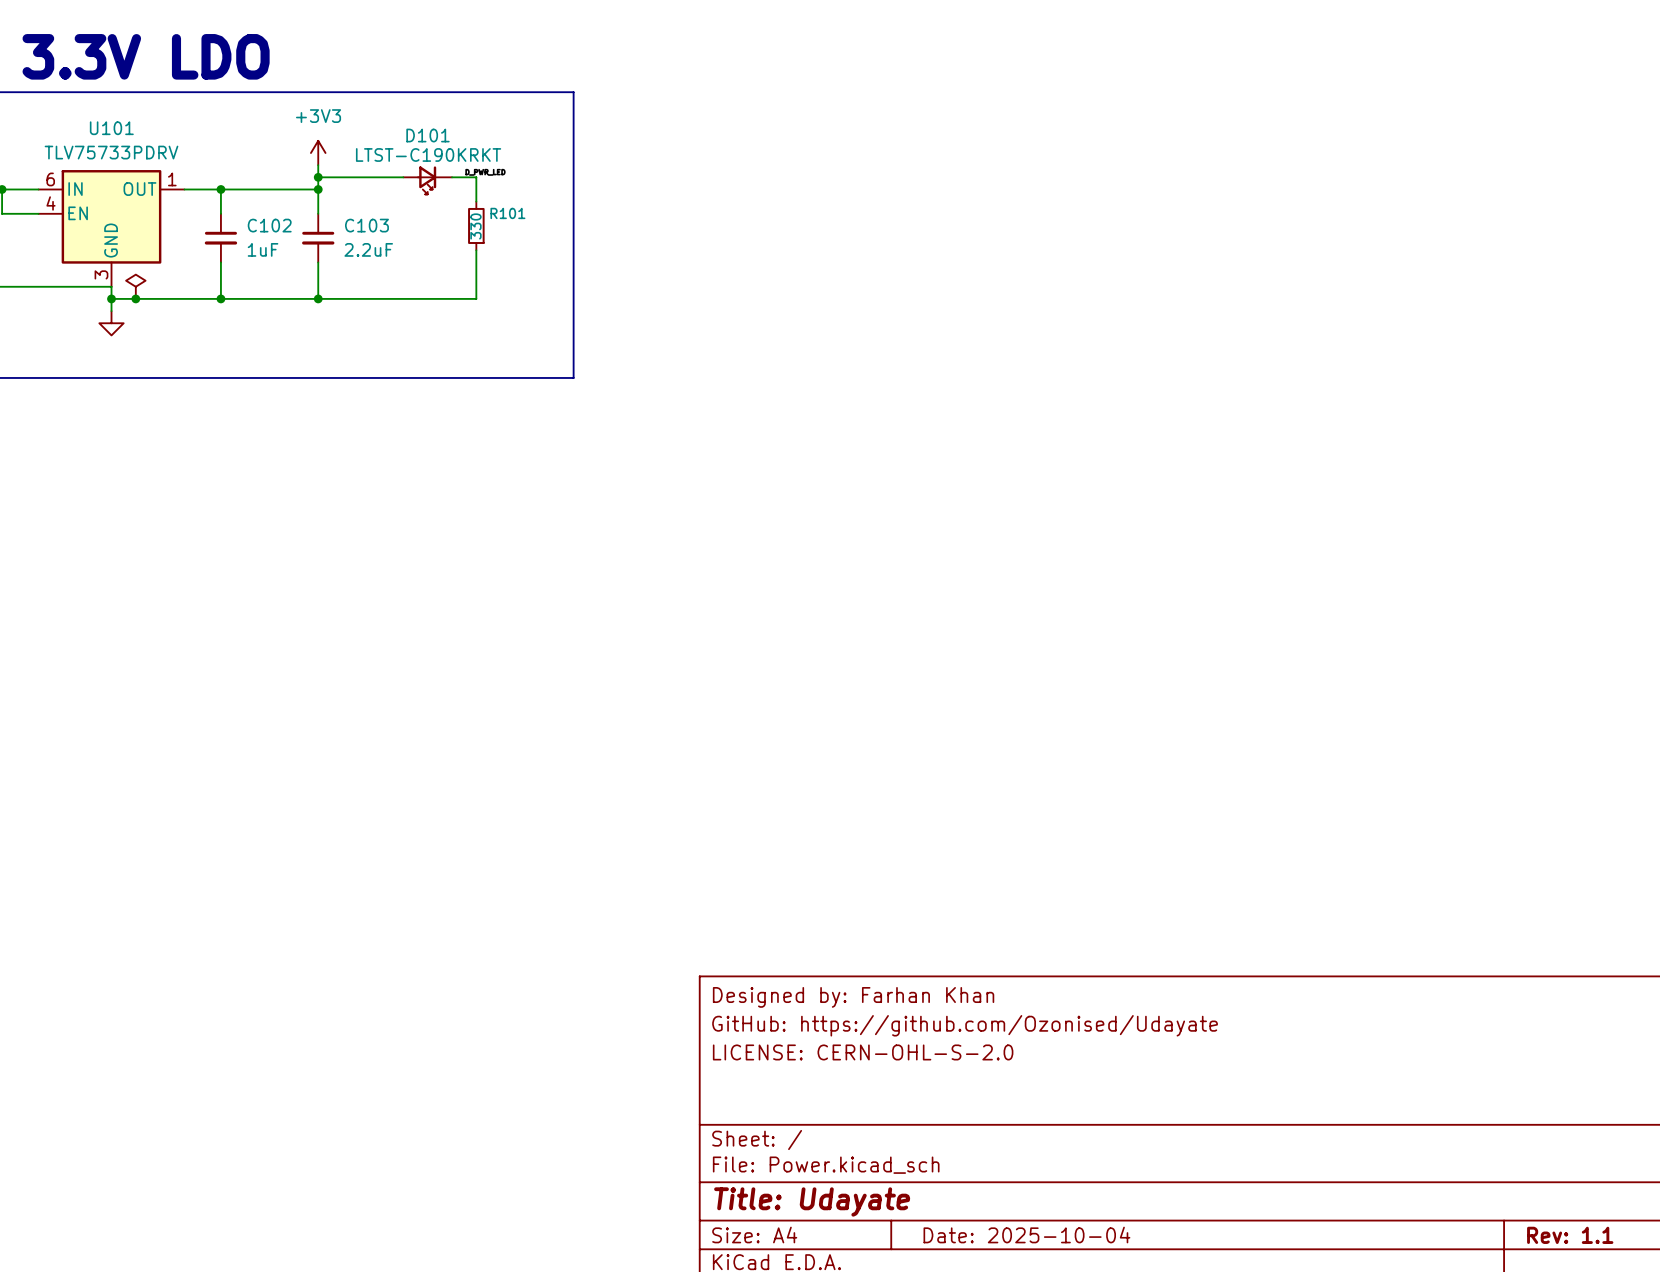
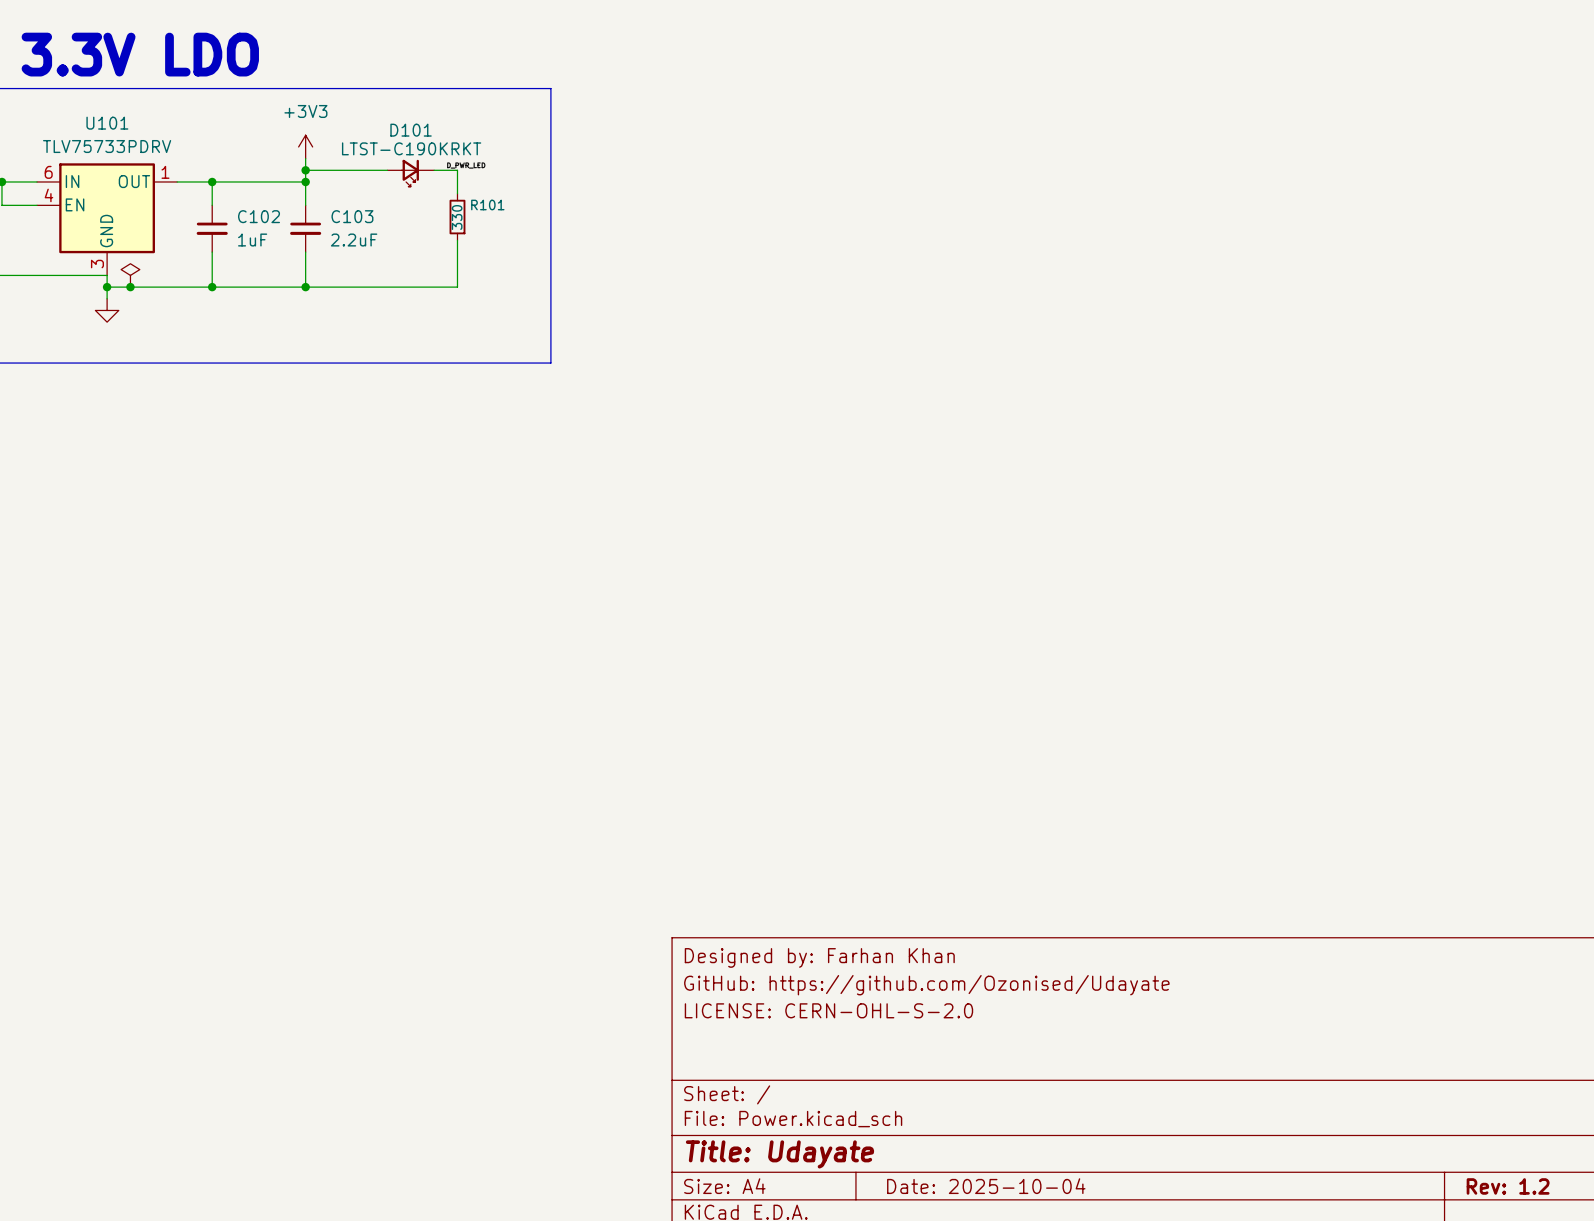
title block: Rev: 1.1 (1570, 1235) -> Rev: 1.2 (1508, 1186)

